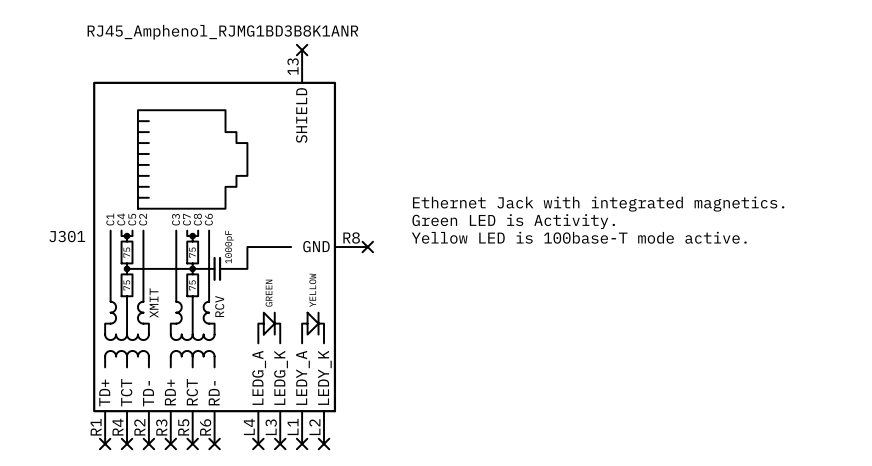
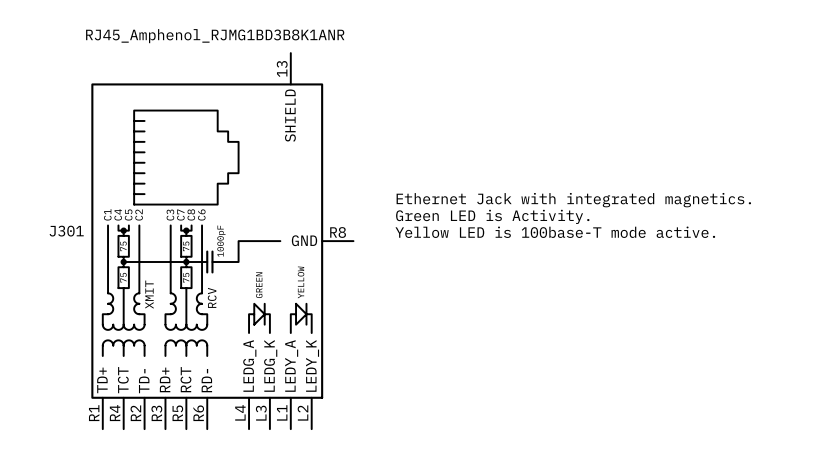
no-connect mark: (302, 50) -> none
no-connect mark: (367, 247) -> none
no-connect mark: (105, 443) -> none
no-connect mark: (127, 443) -> none
no-connect mark: (148, 443) -> none
no-connect mark: (170, 443) -> none
no-connect mark: (192, 443) -> none
no-connect mark: (214, 443) -> none
no-connect mark: (258, 443) -> none
no-connect mark: (280, 443) -> none
no-connect mark: (302, 443) -> none
no-connect mark: (324, 443) -> none

